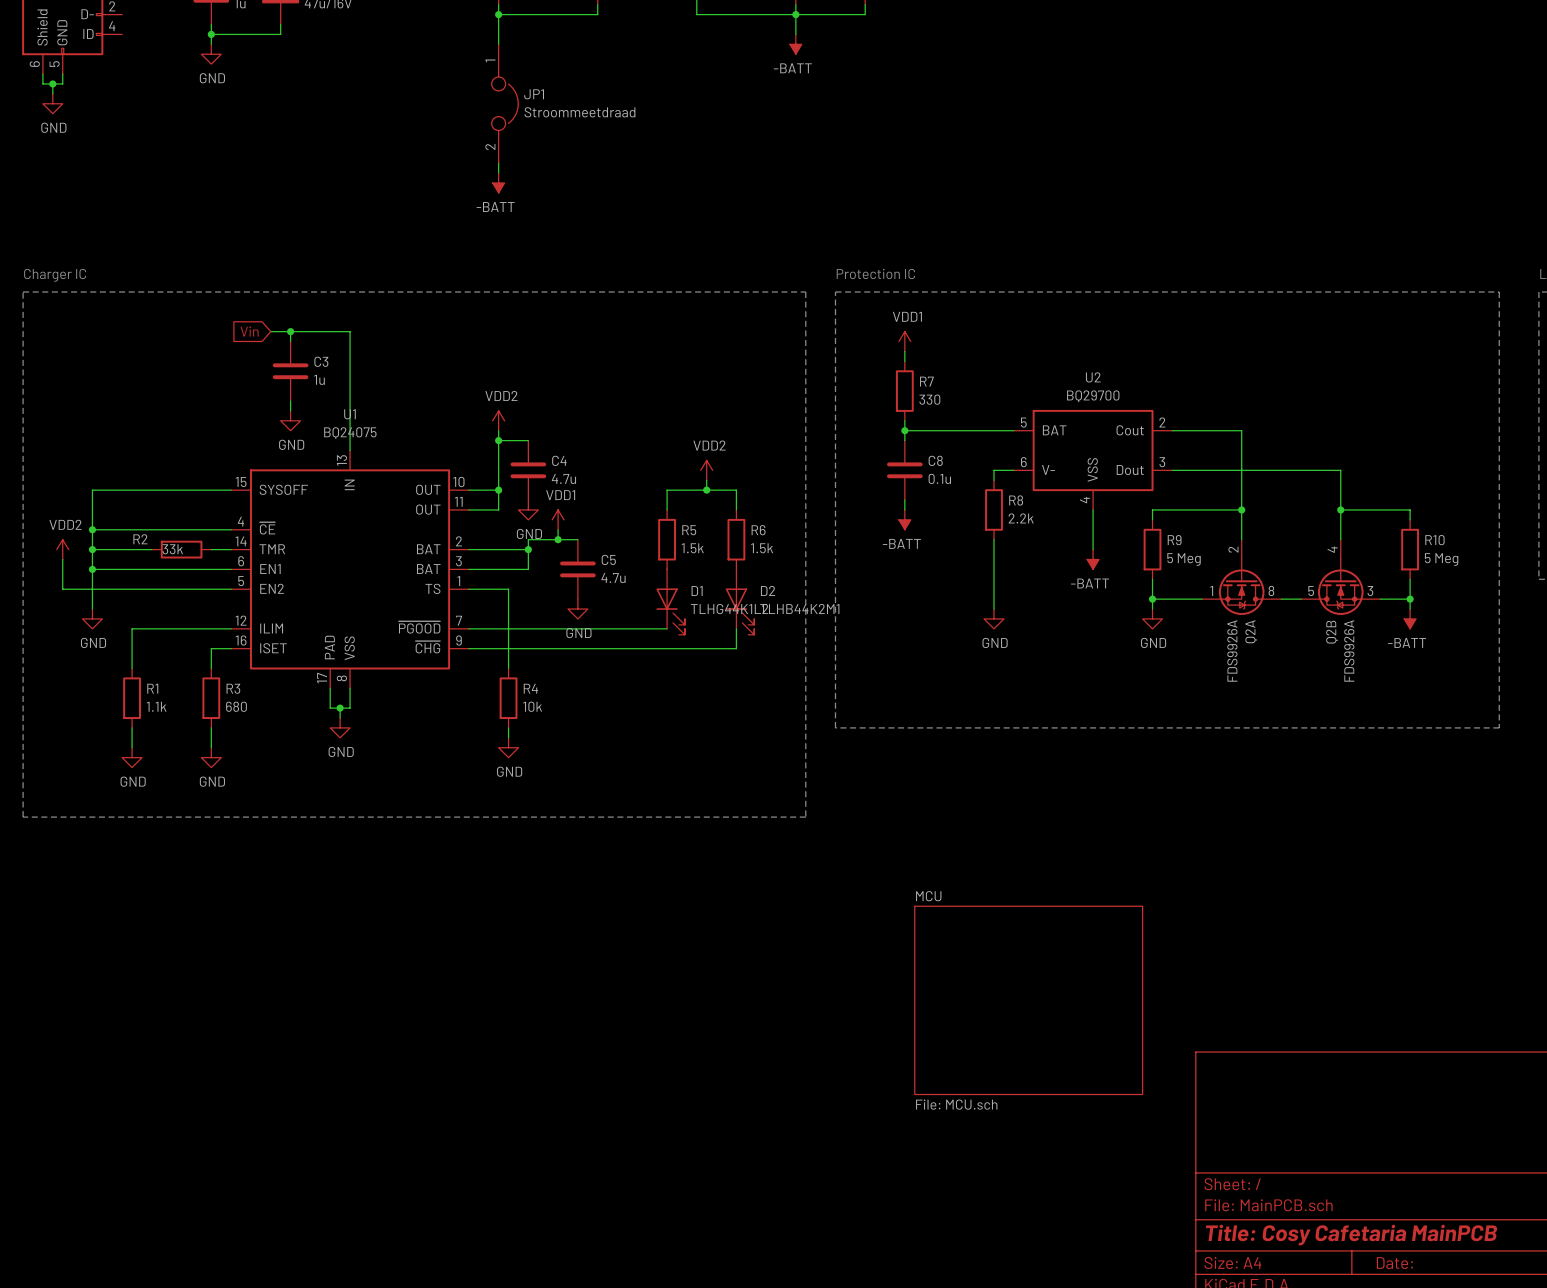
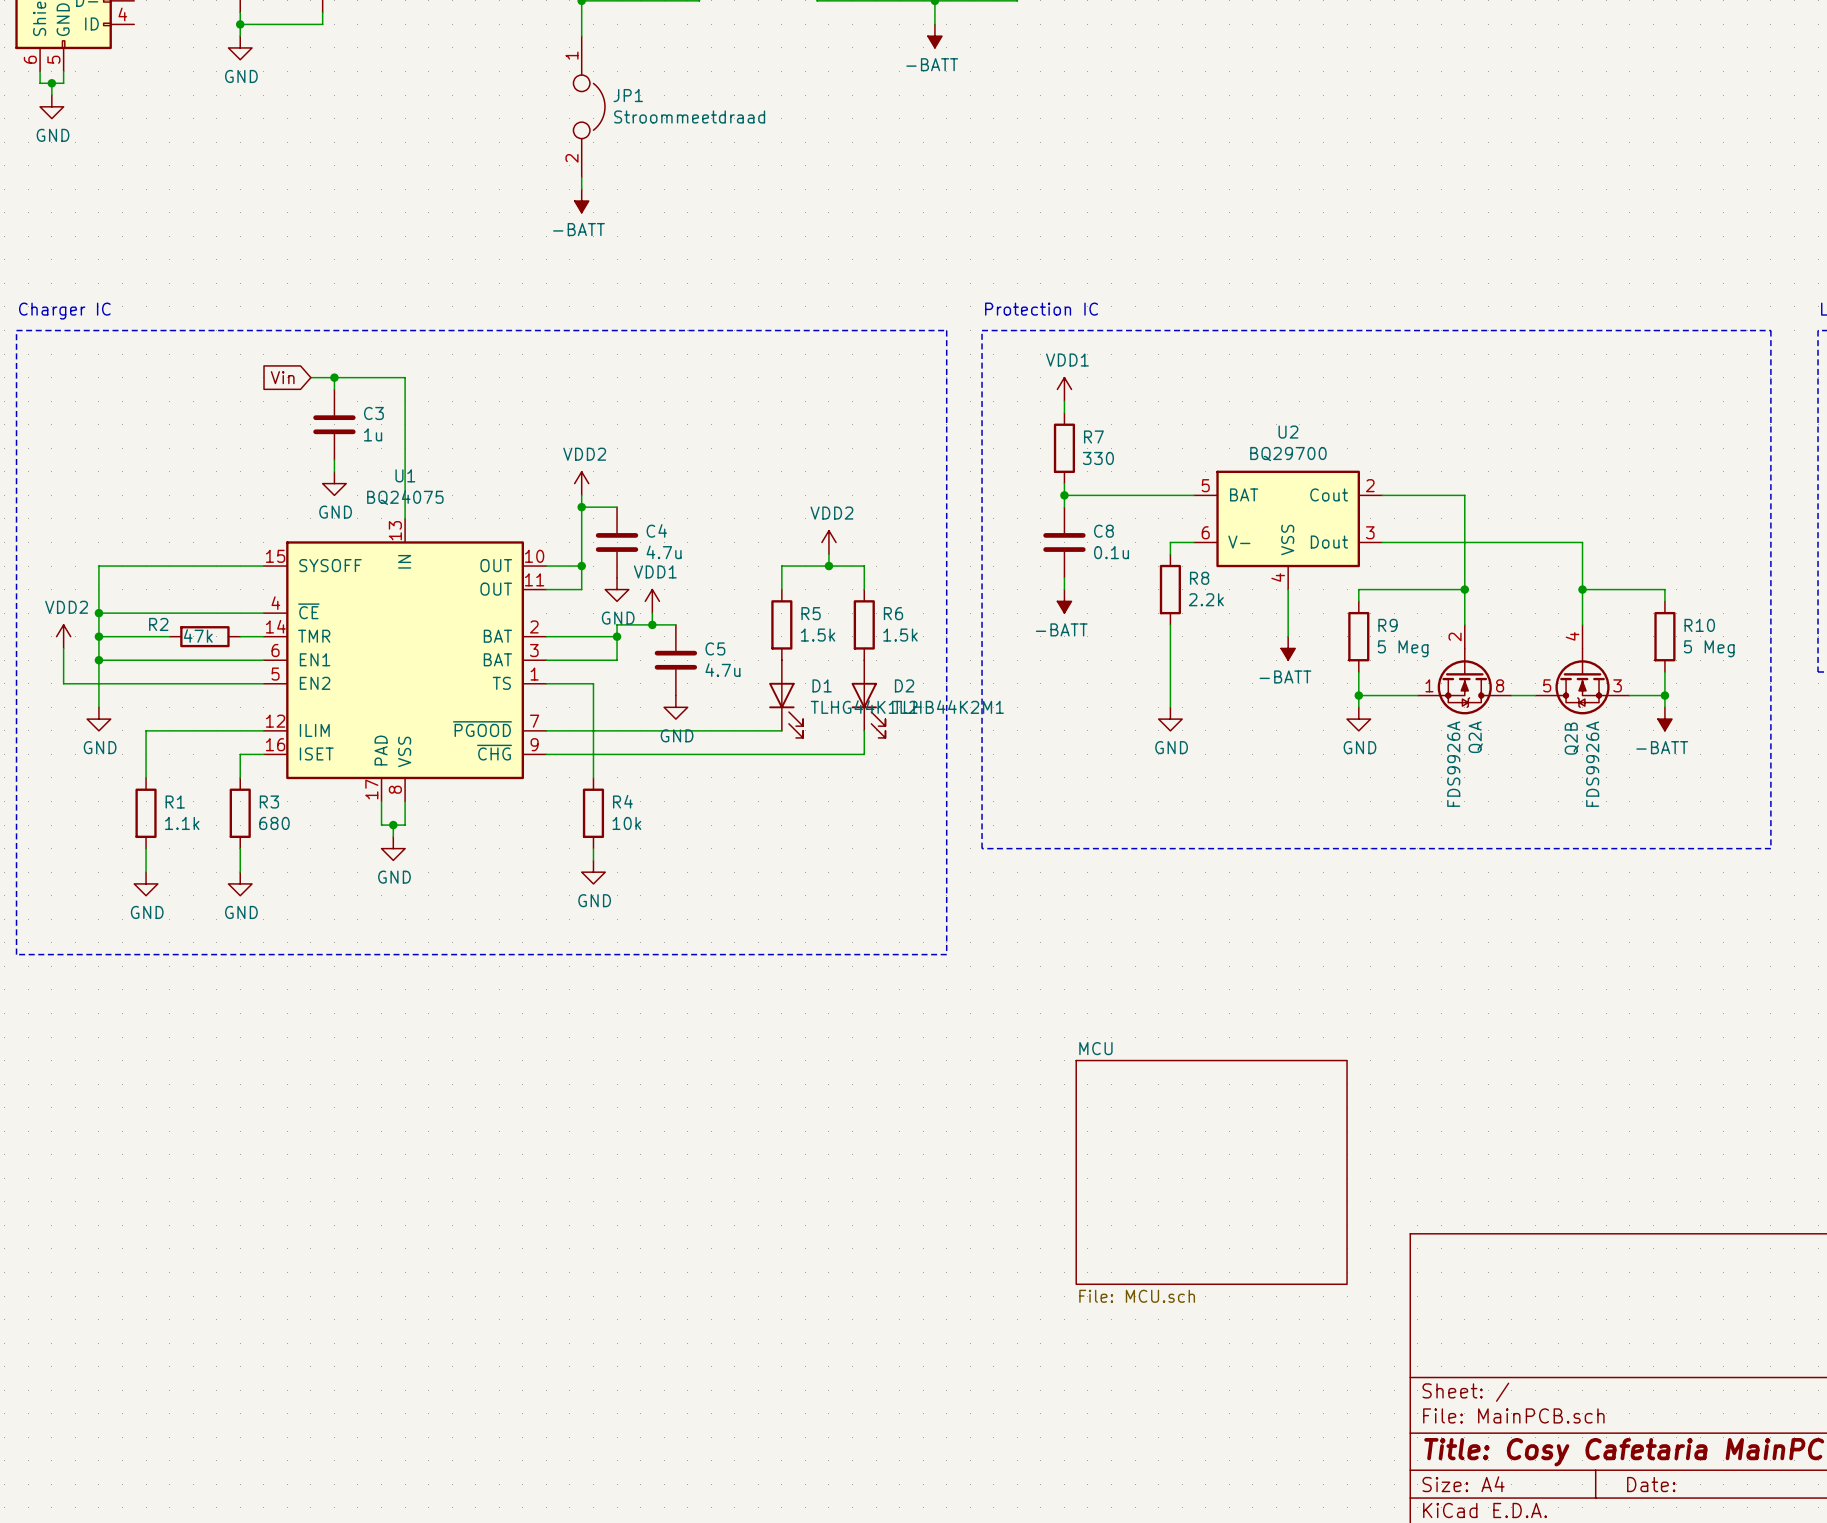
R2 value: 33k (172, 549) -> 47k (198, 635)

